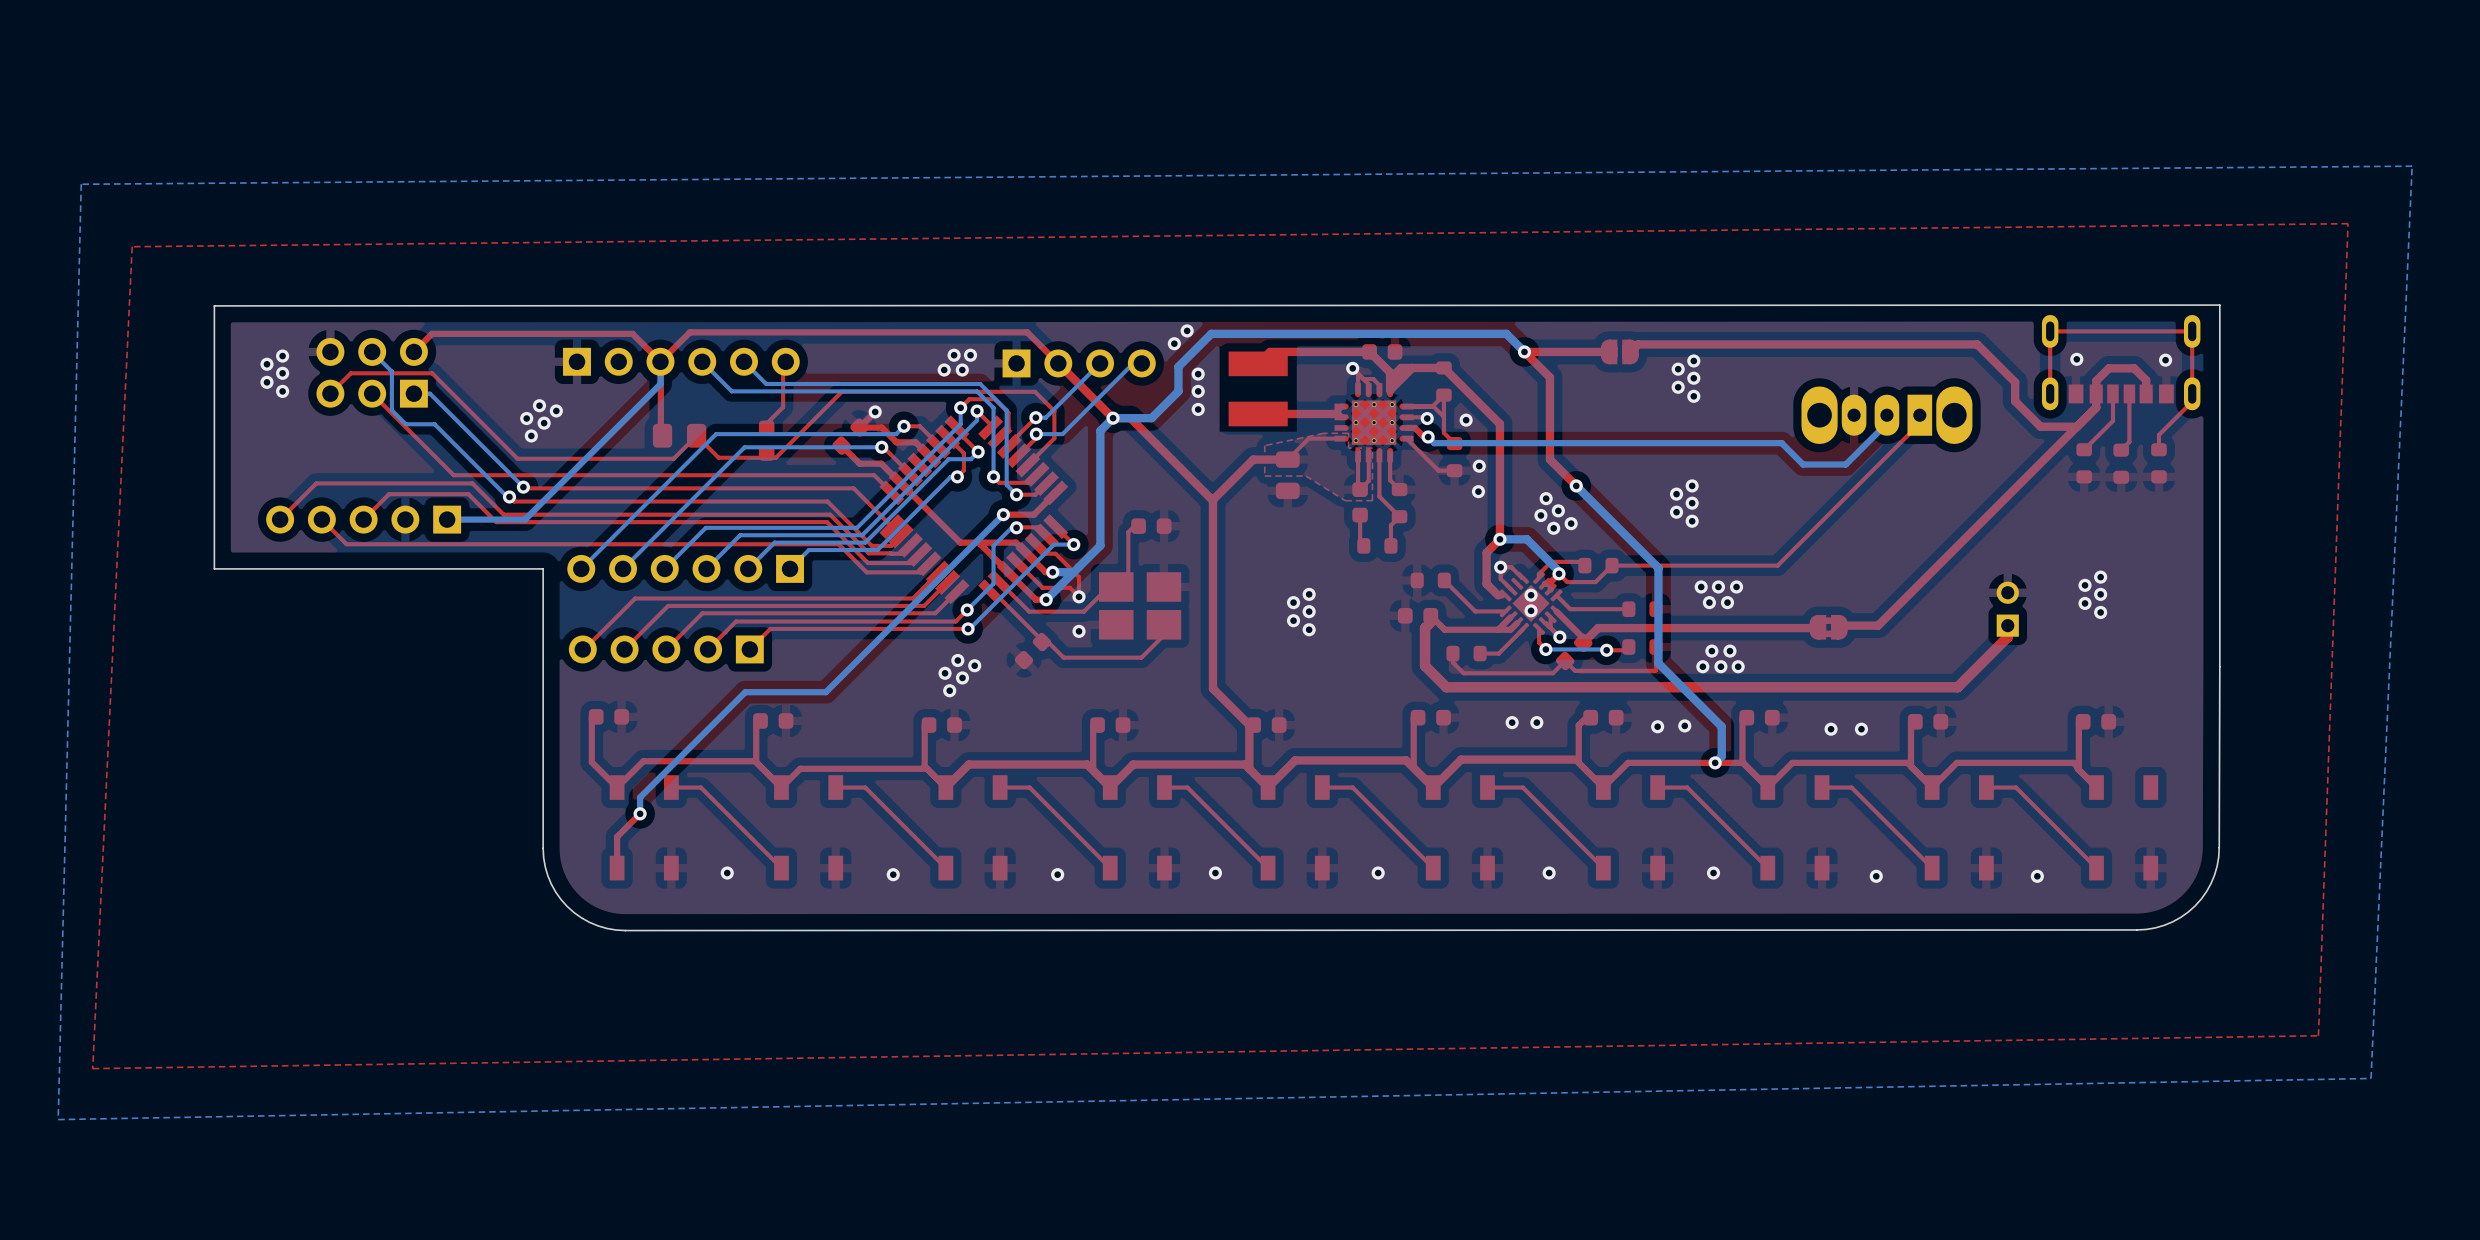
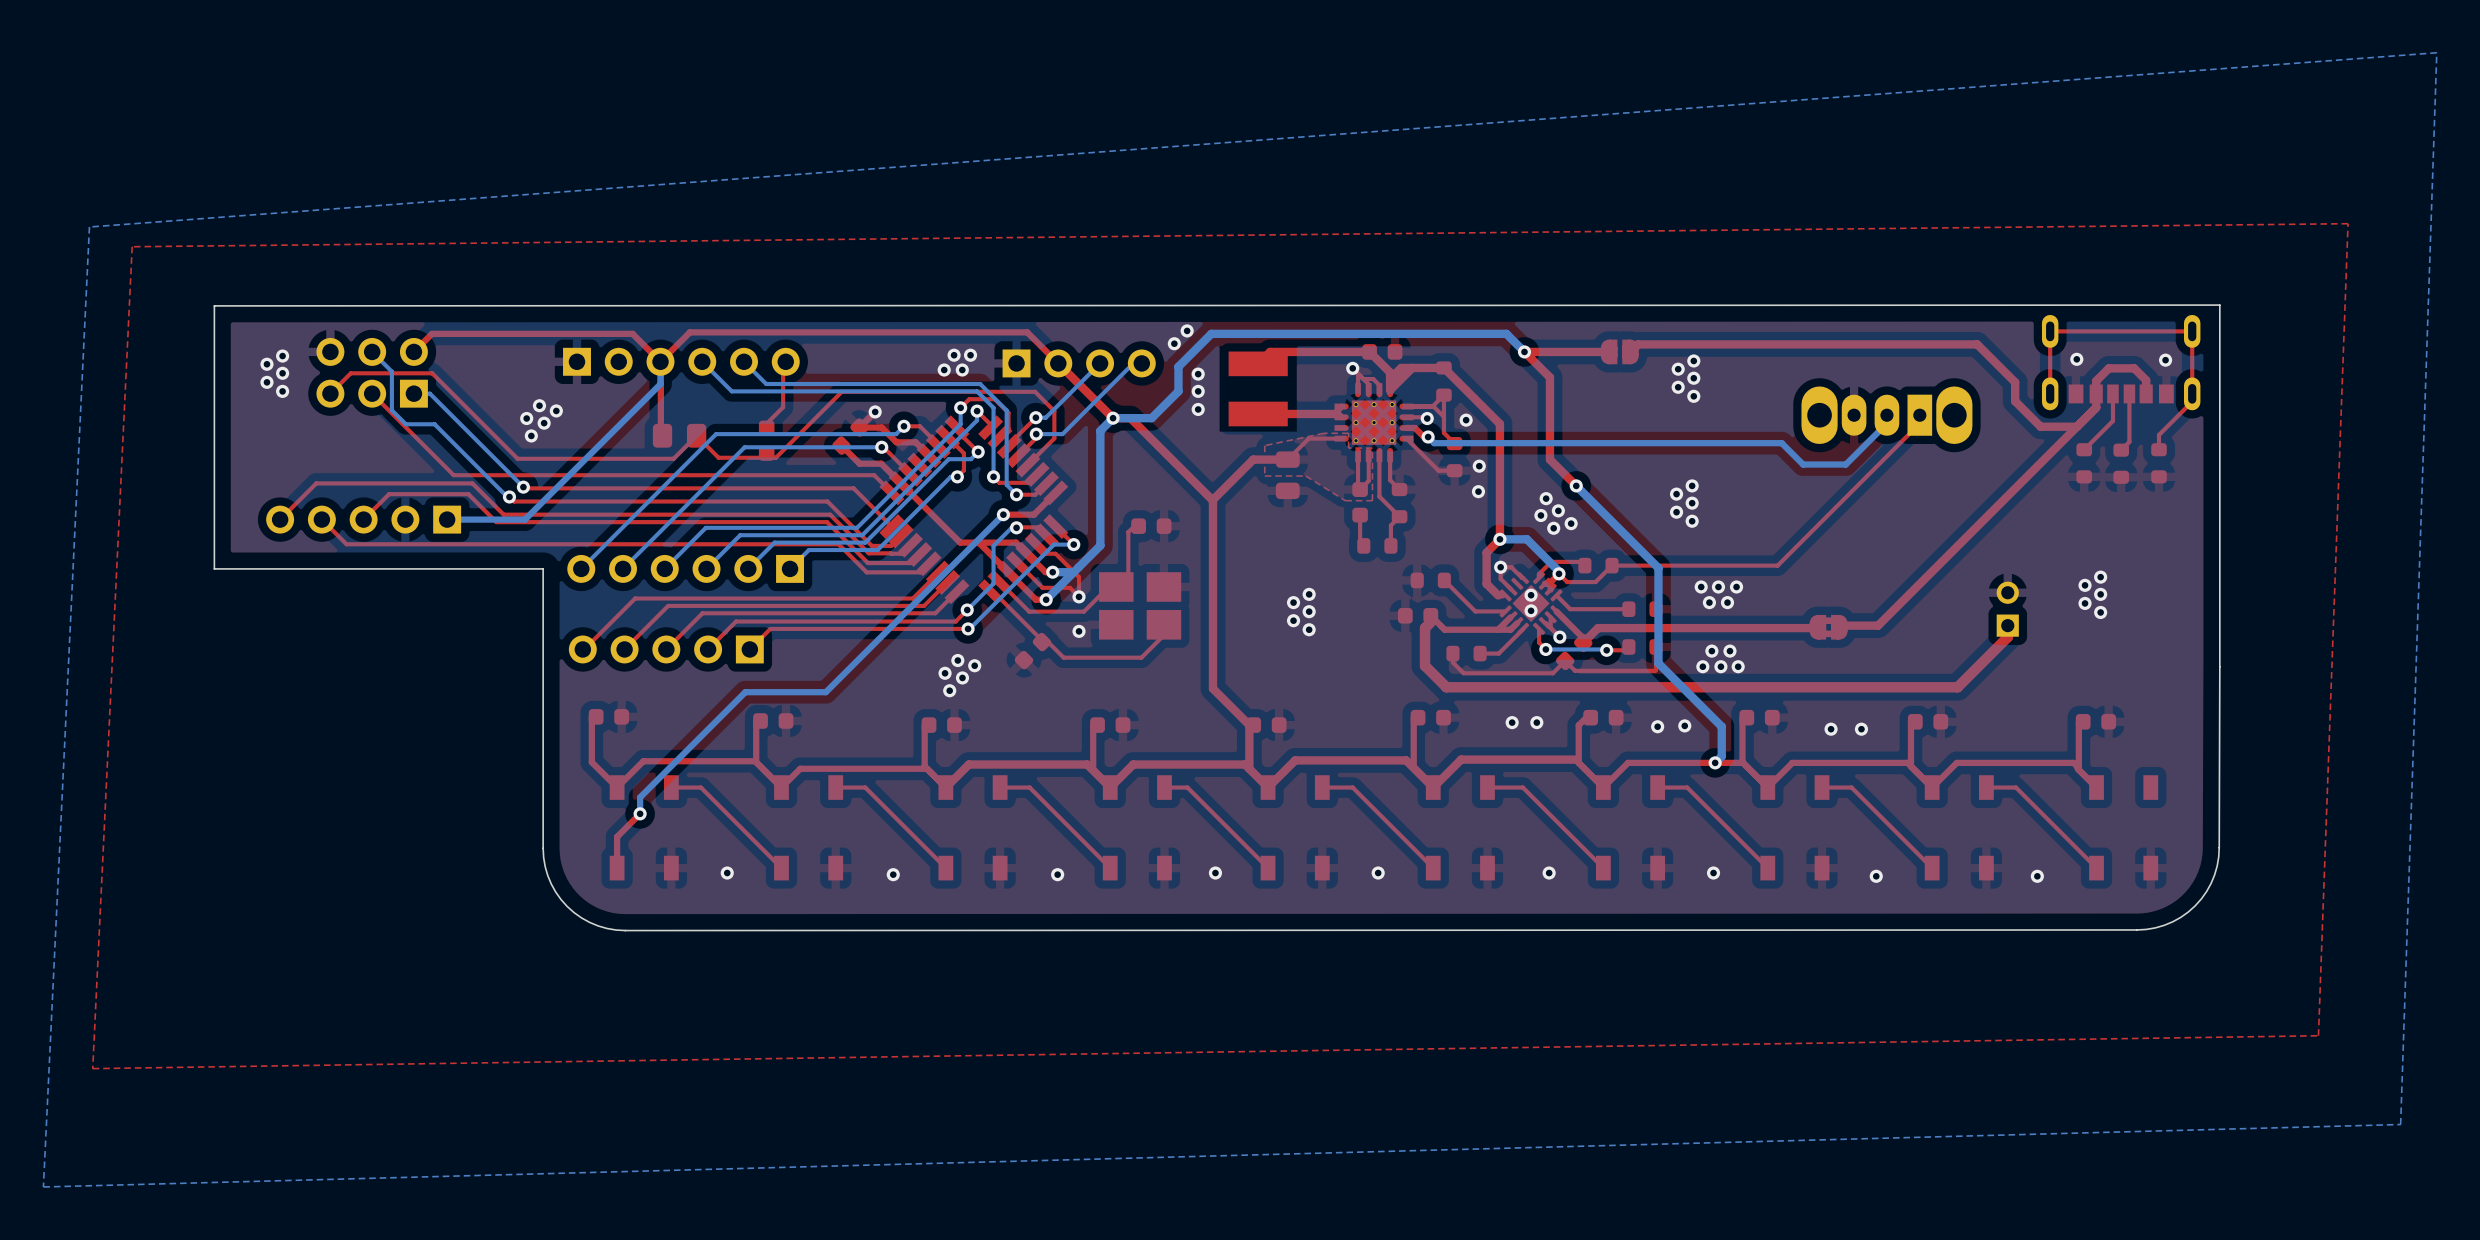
bottom zone outline: (2412, 166) (2371, 1078) (58, 1119) (81, 184) (2412, 166) -> (2436, 52) (2400, 1124) (43, 1186) (89, 227) (2436, 52)

